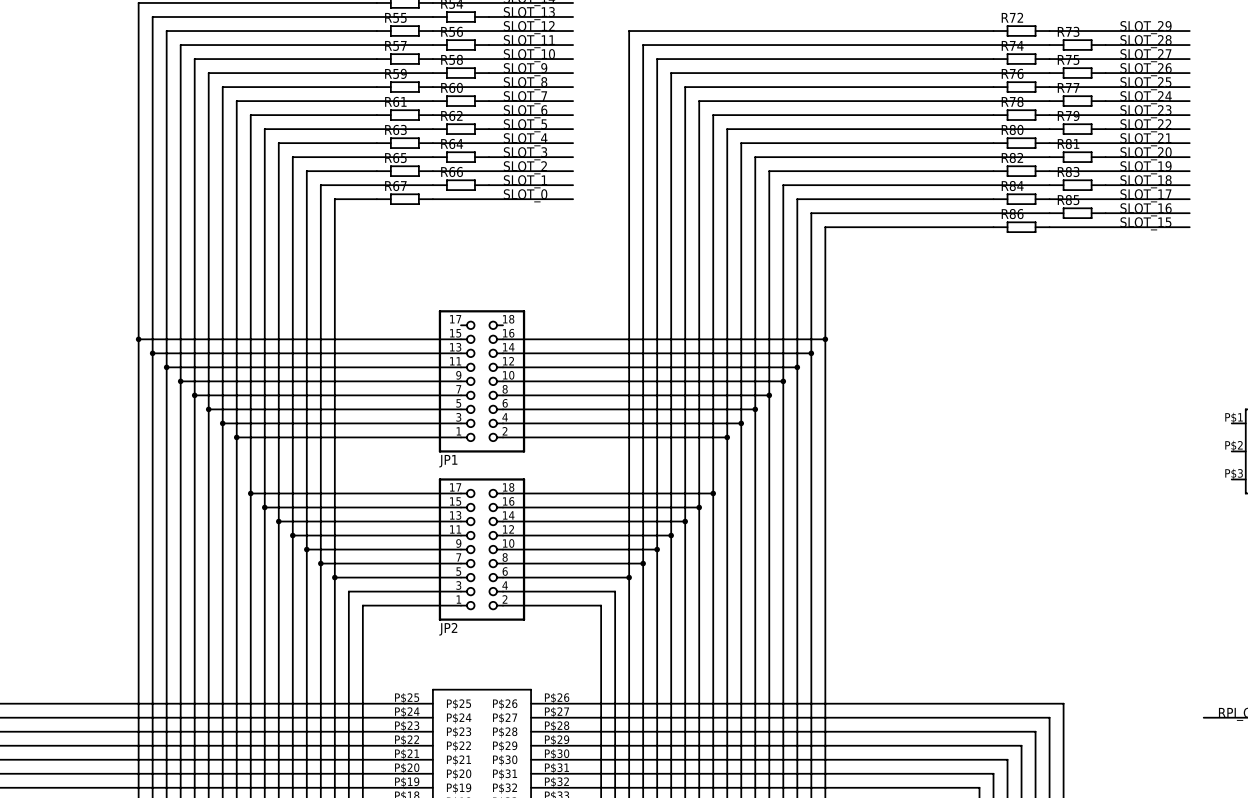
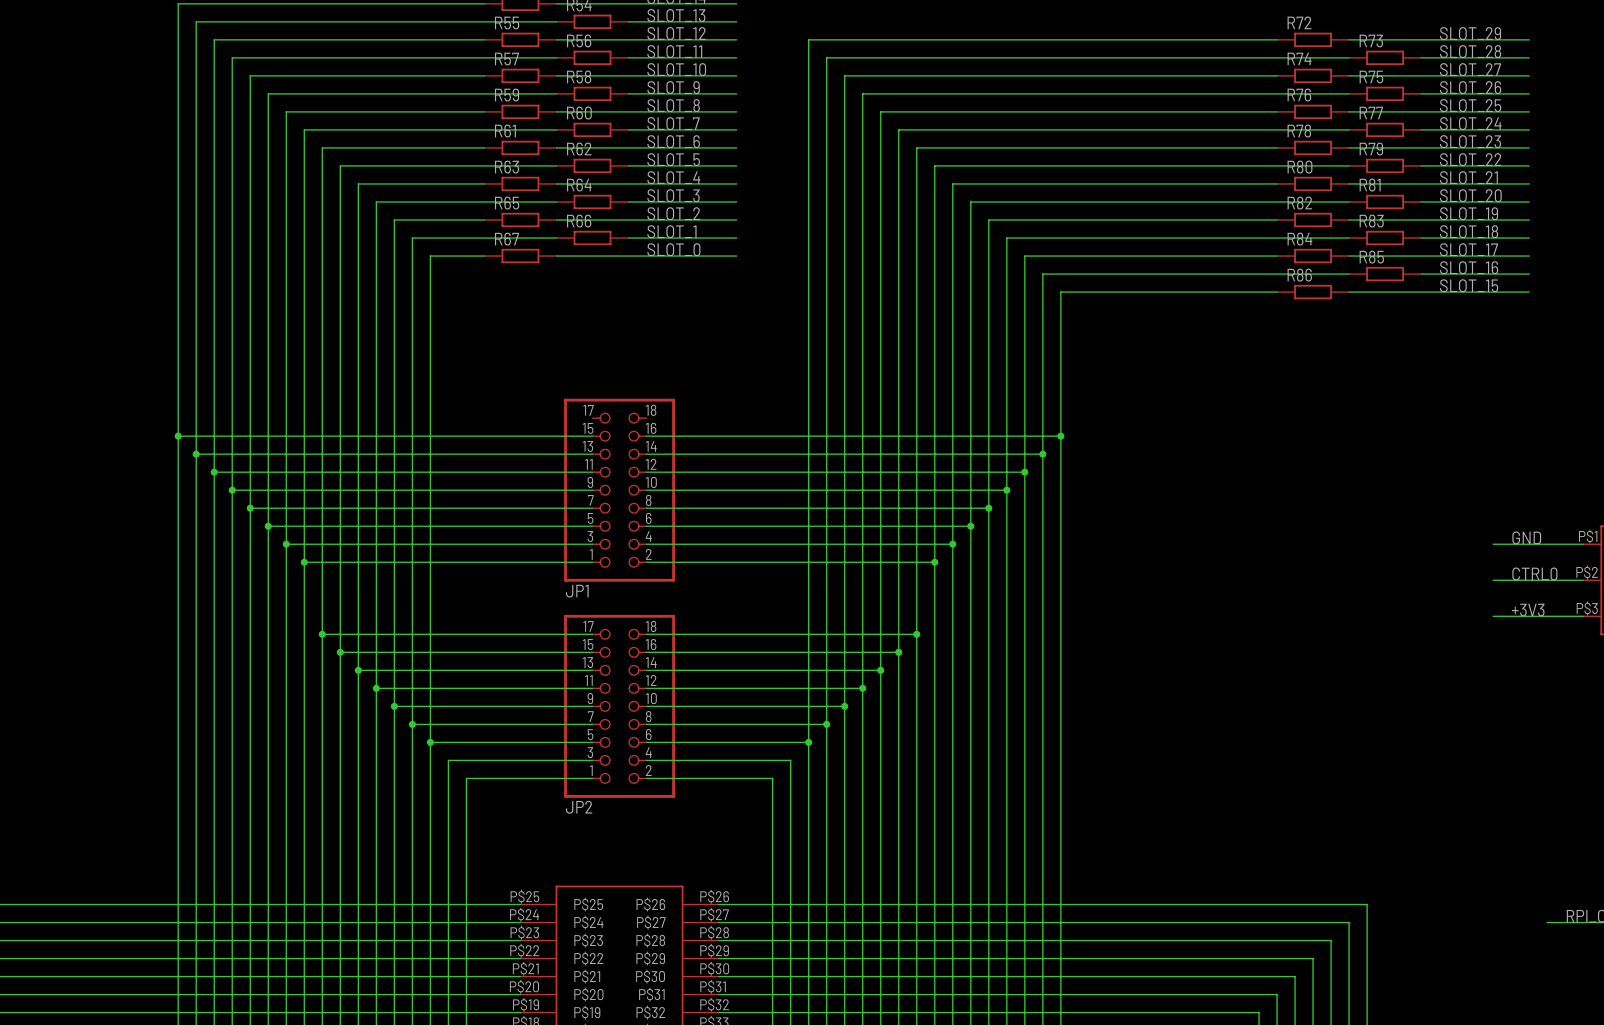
label: none -> GND (1526, 537)
wire: none -> (1493, 544) (1583, 544)
label: none -> CTRL0 (1534, 573)
wire: none -> (1493, 580) (1583, 580)
label: none -> +3V3 (1528, 610)
wire: none -> (1493, 616) (1583, 616)

